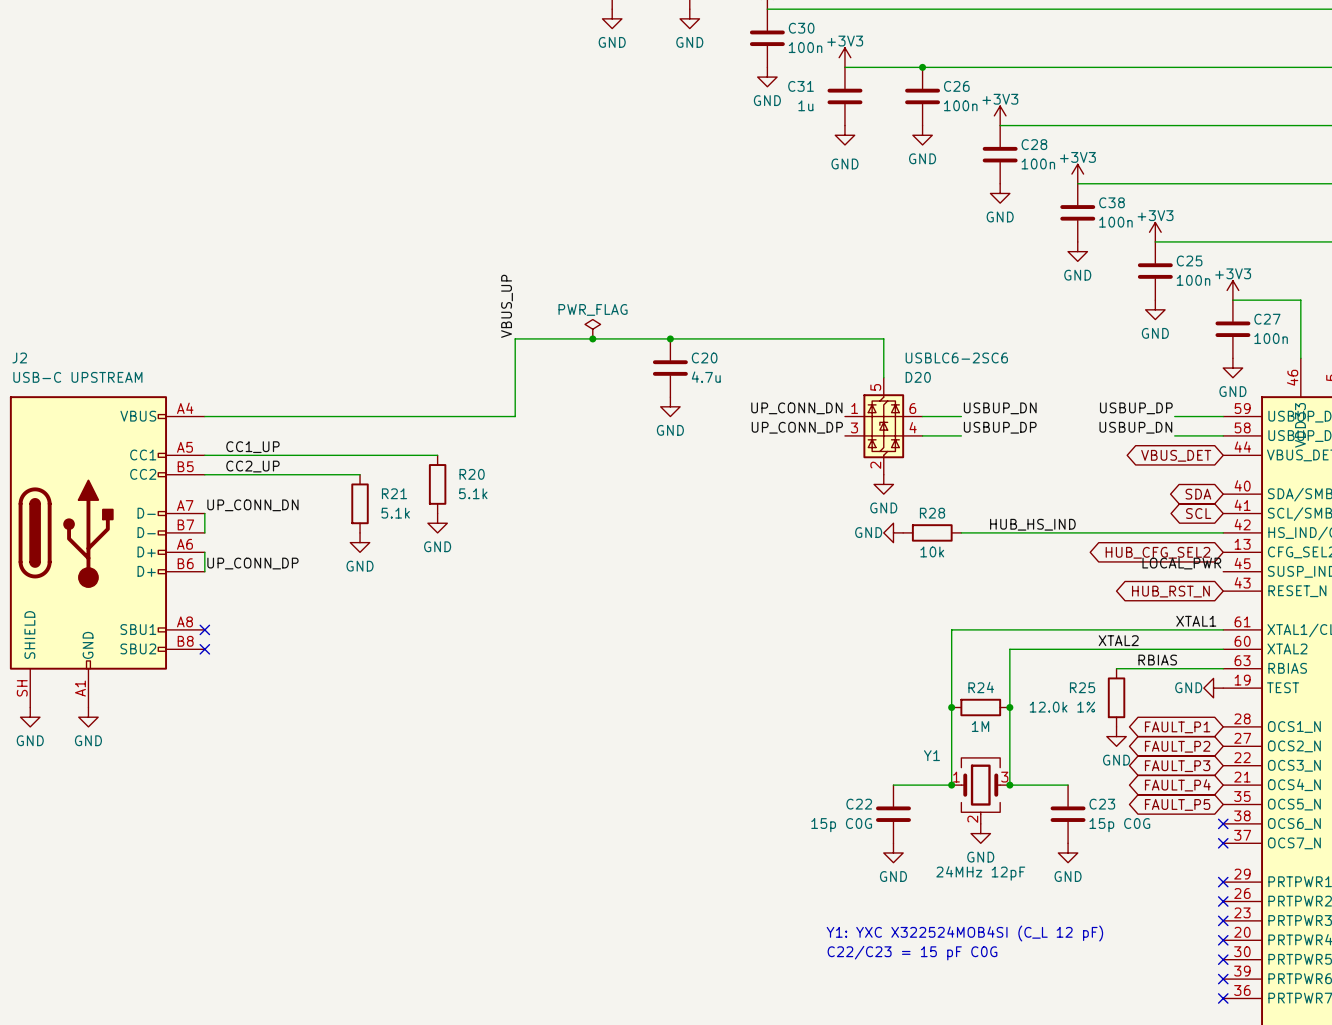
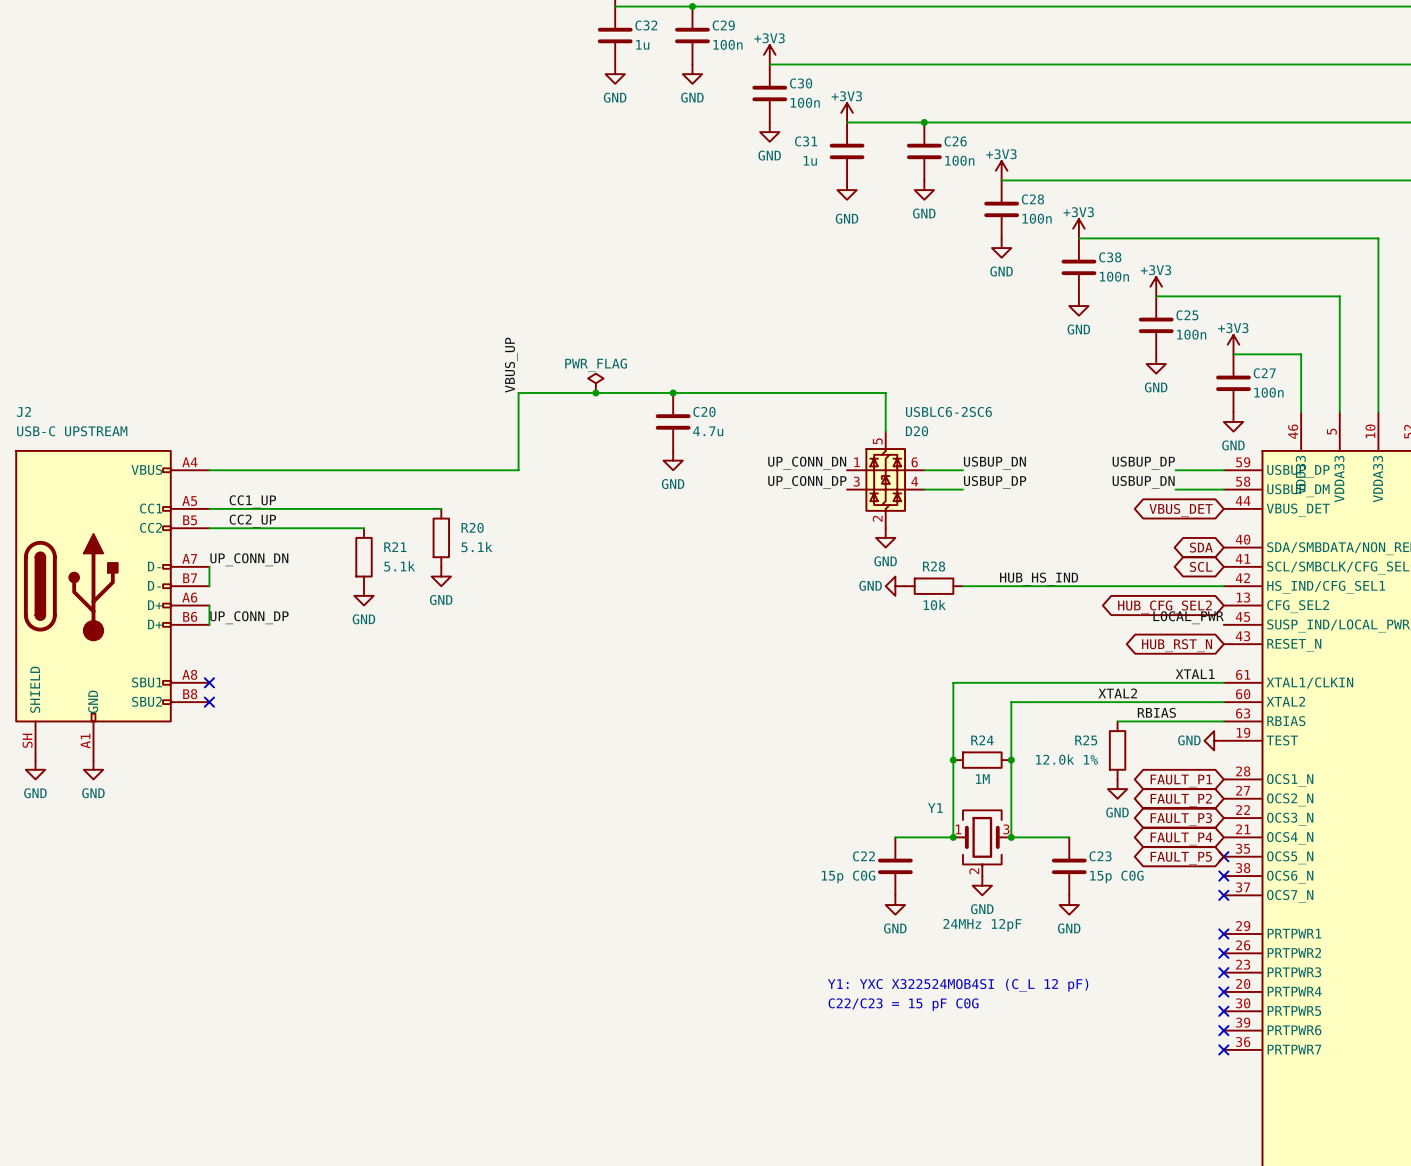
no-connect mark: none -> (1223, 856)

